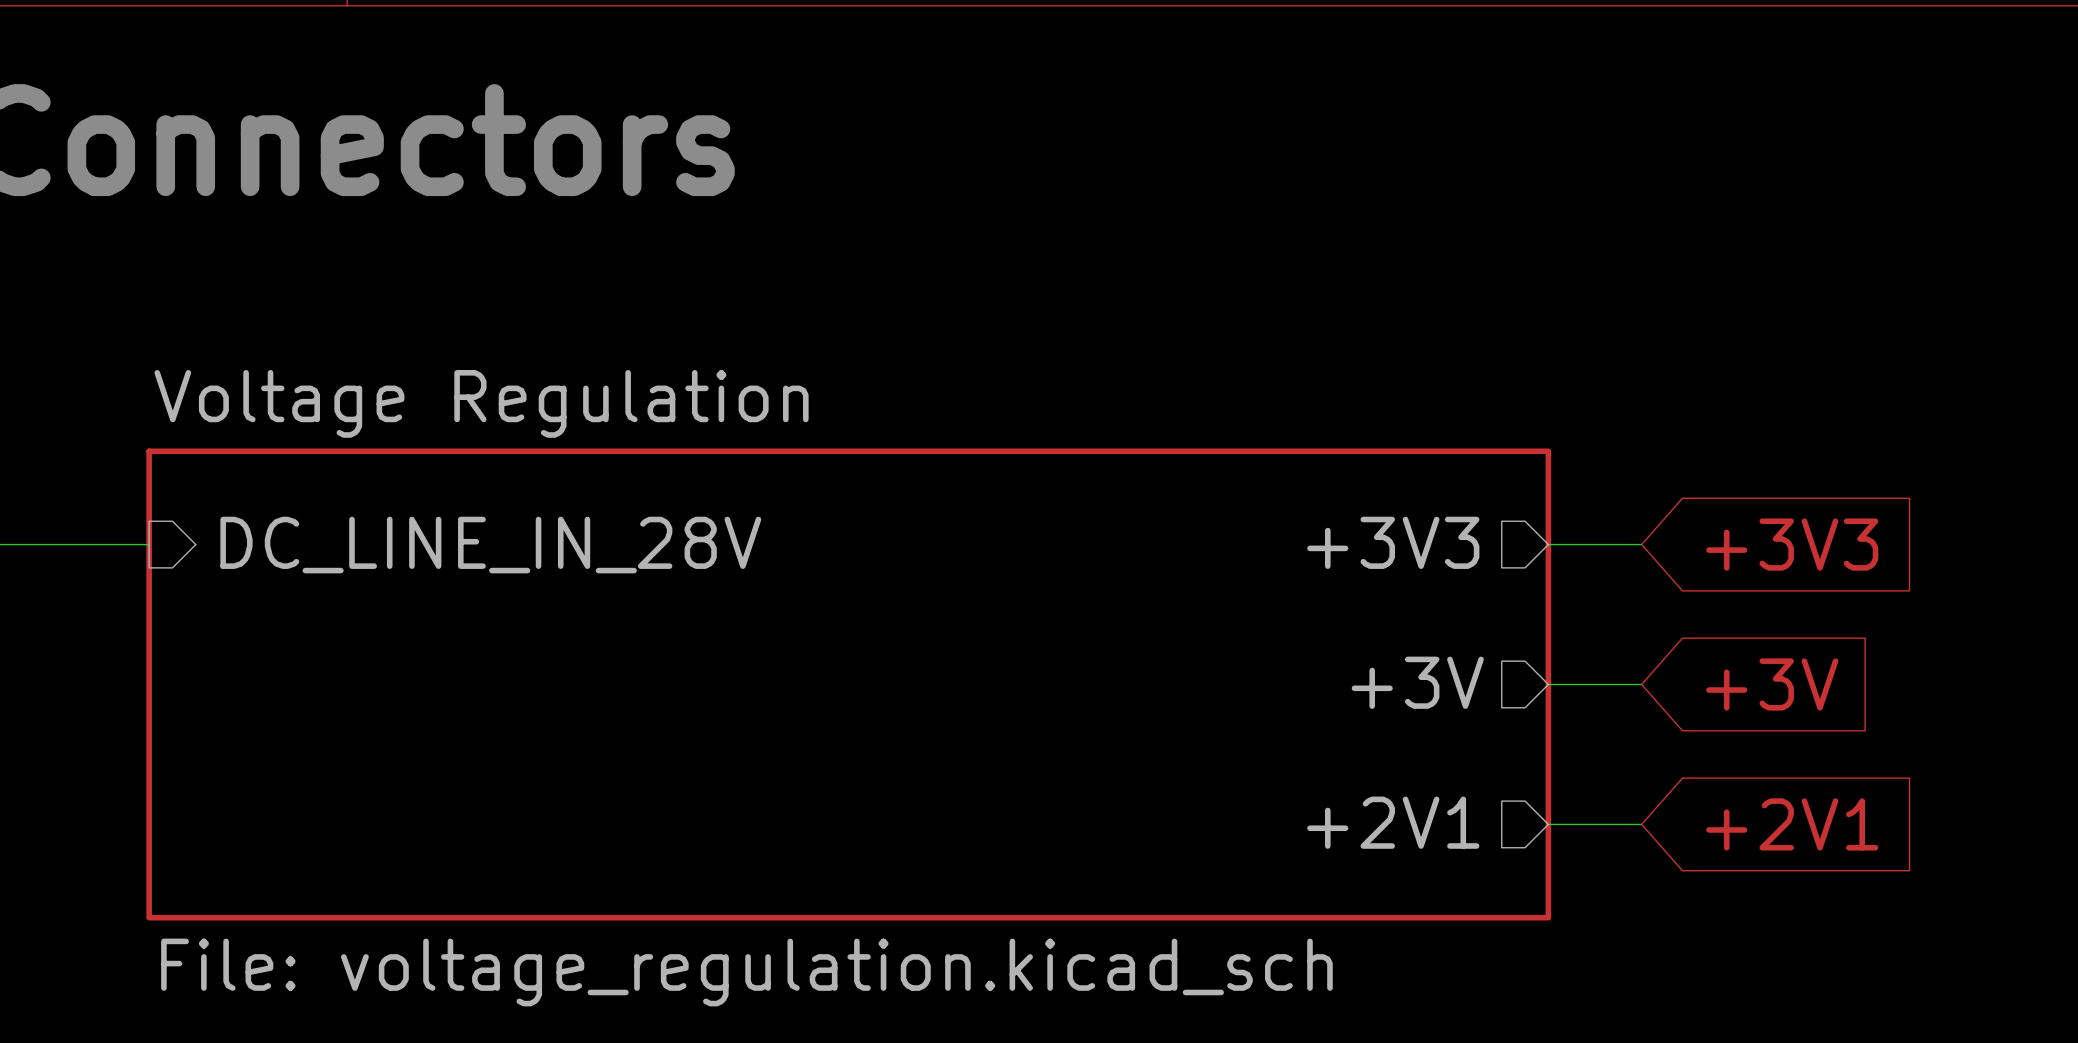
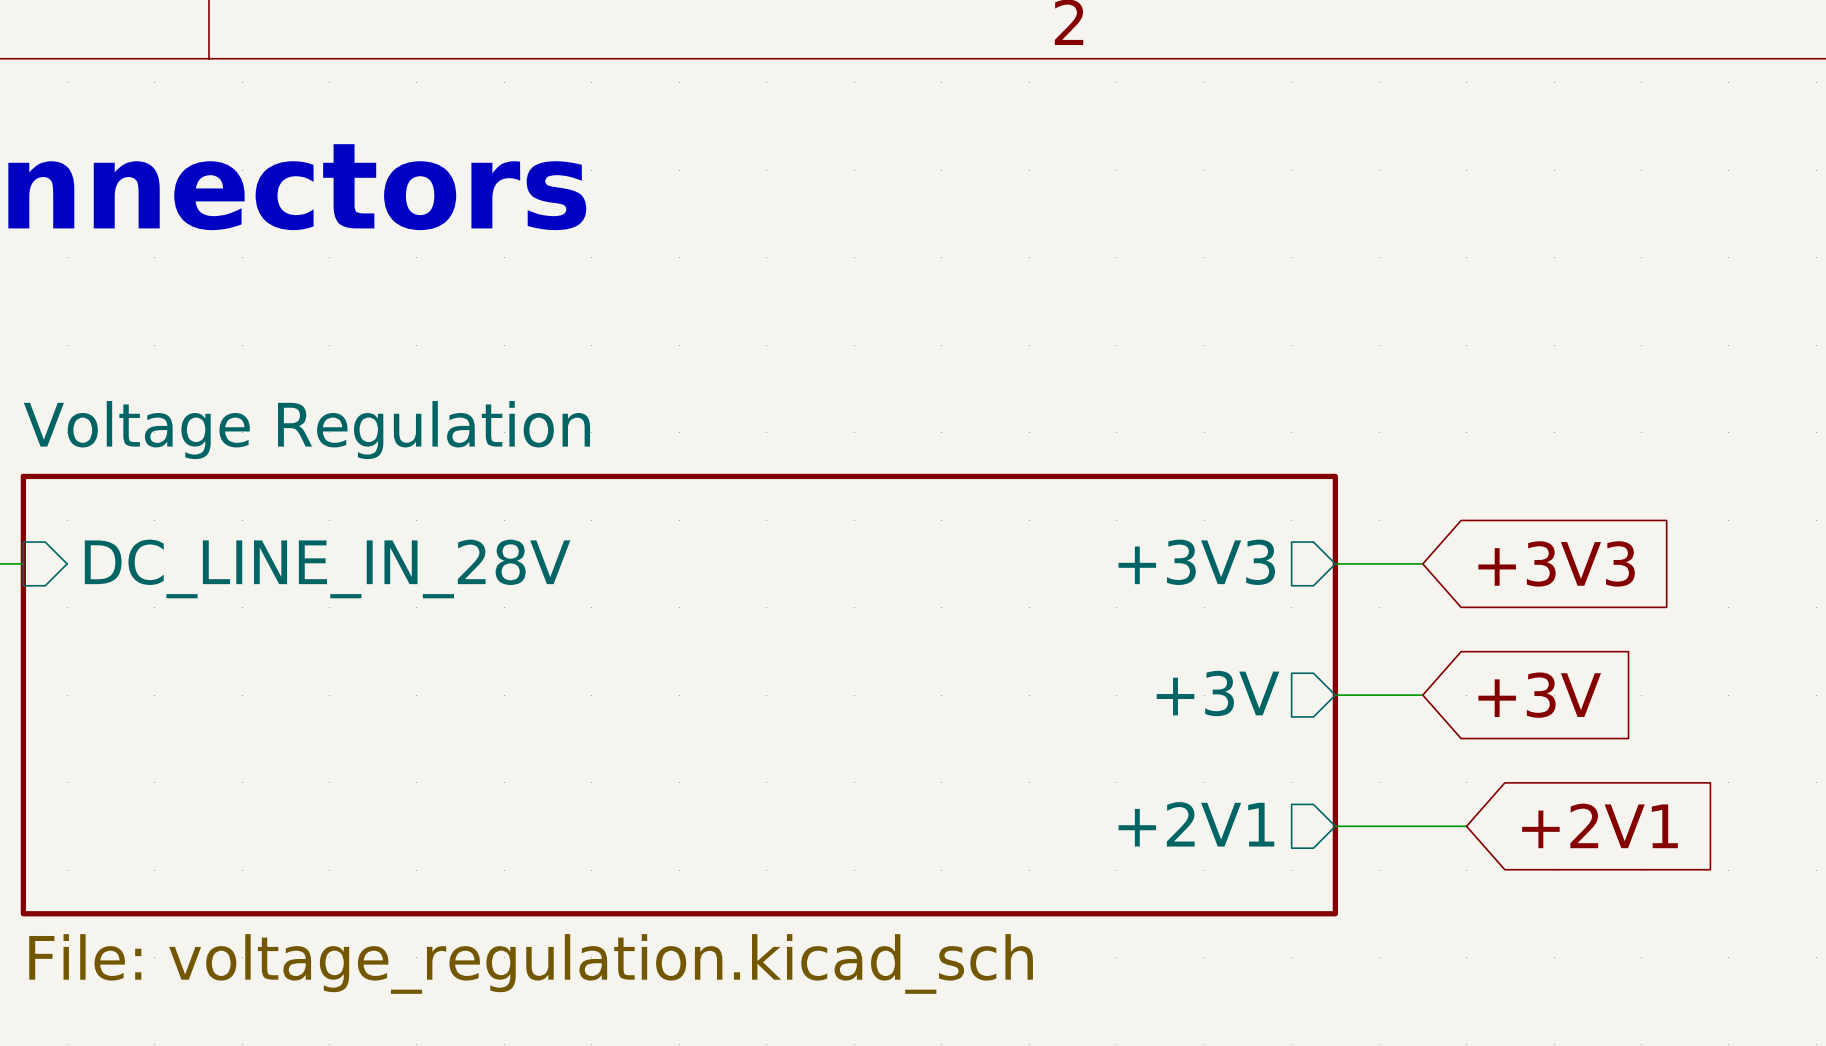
wire: none -> (1422, 826) (1466, 826)
global label position: +2V1 (1792, 824) -> +2V1 (1599, 825)

